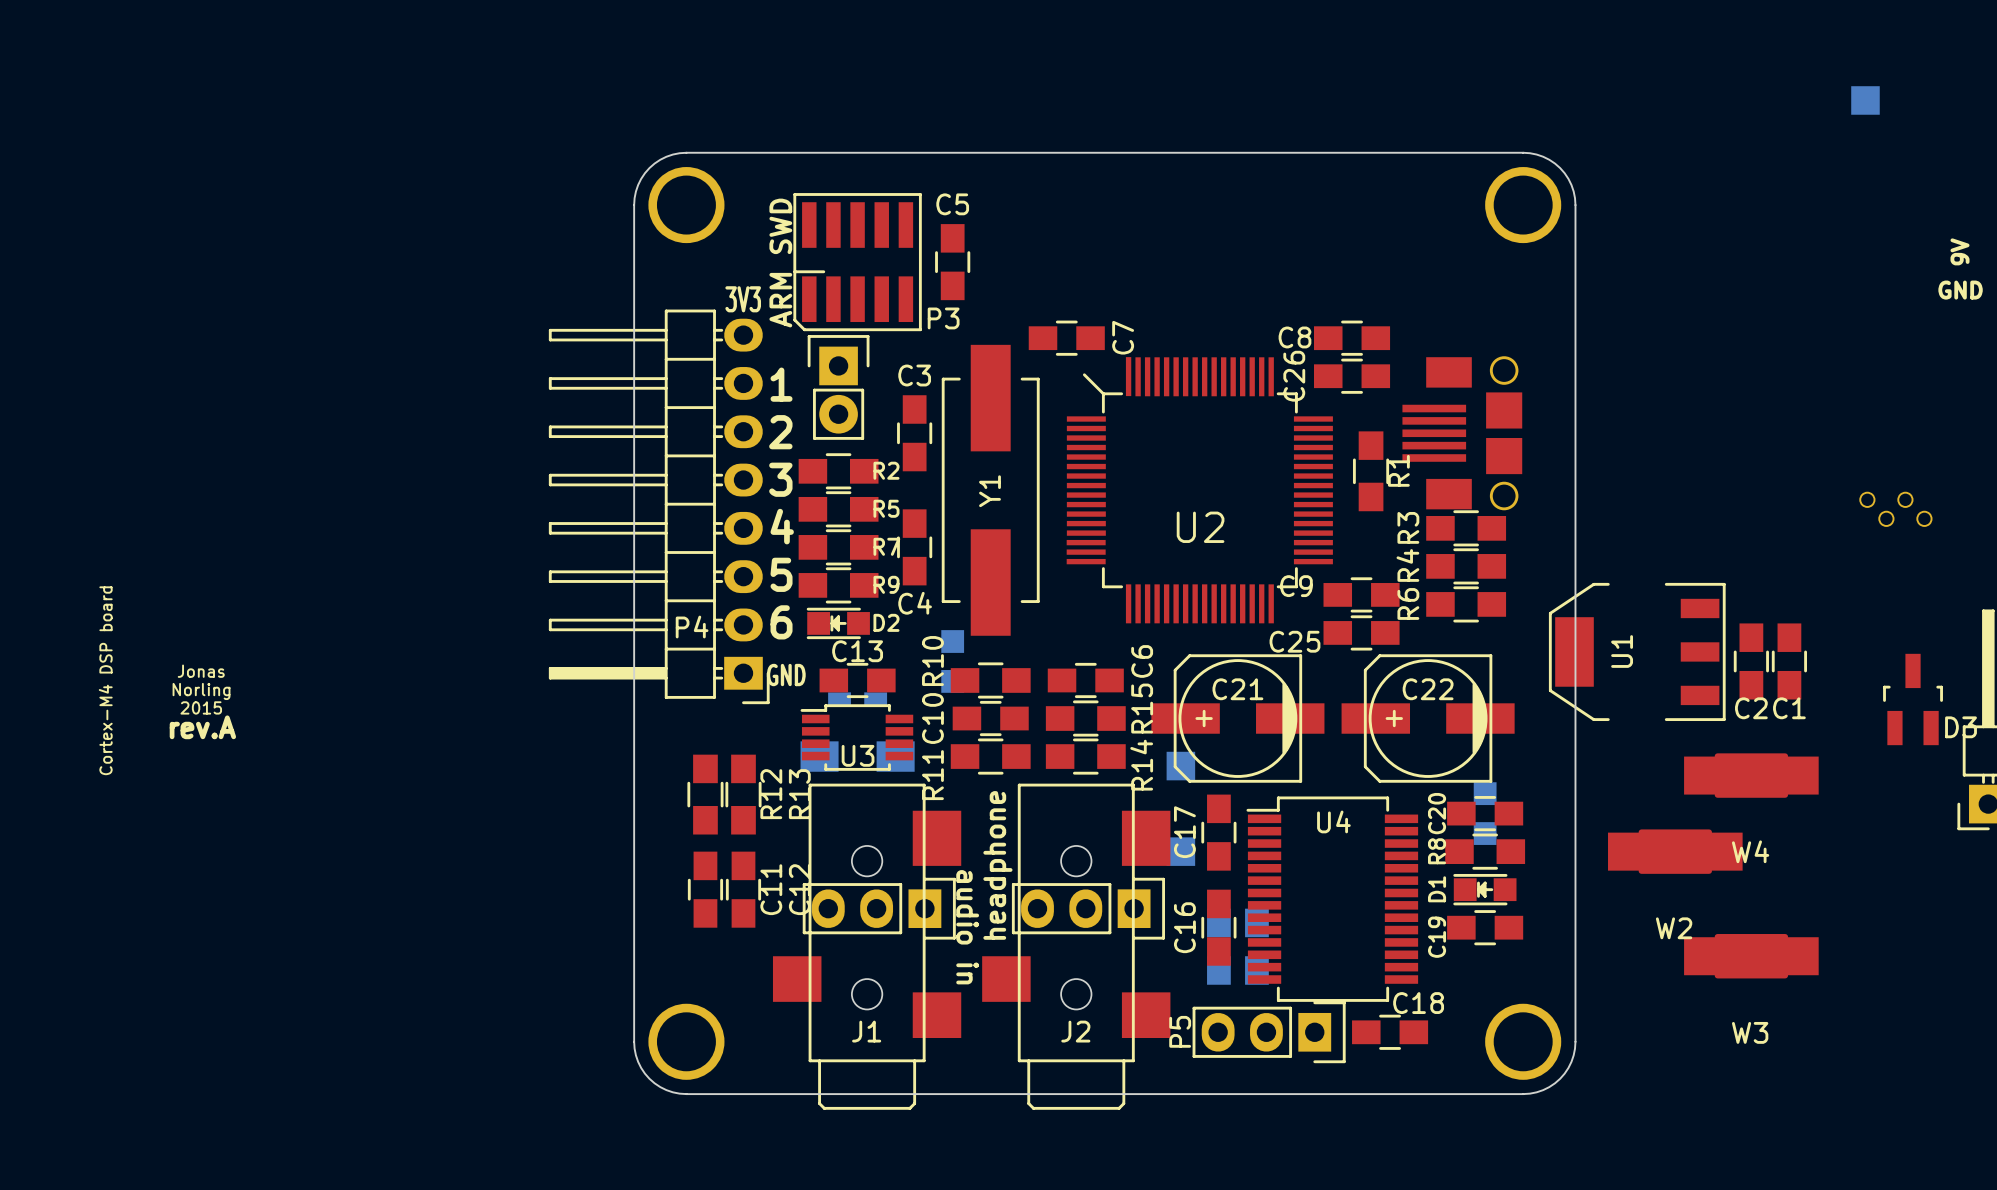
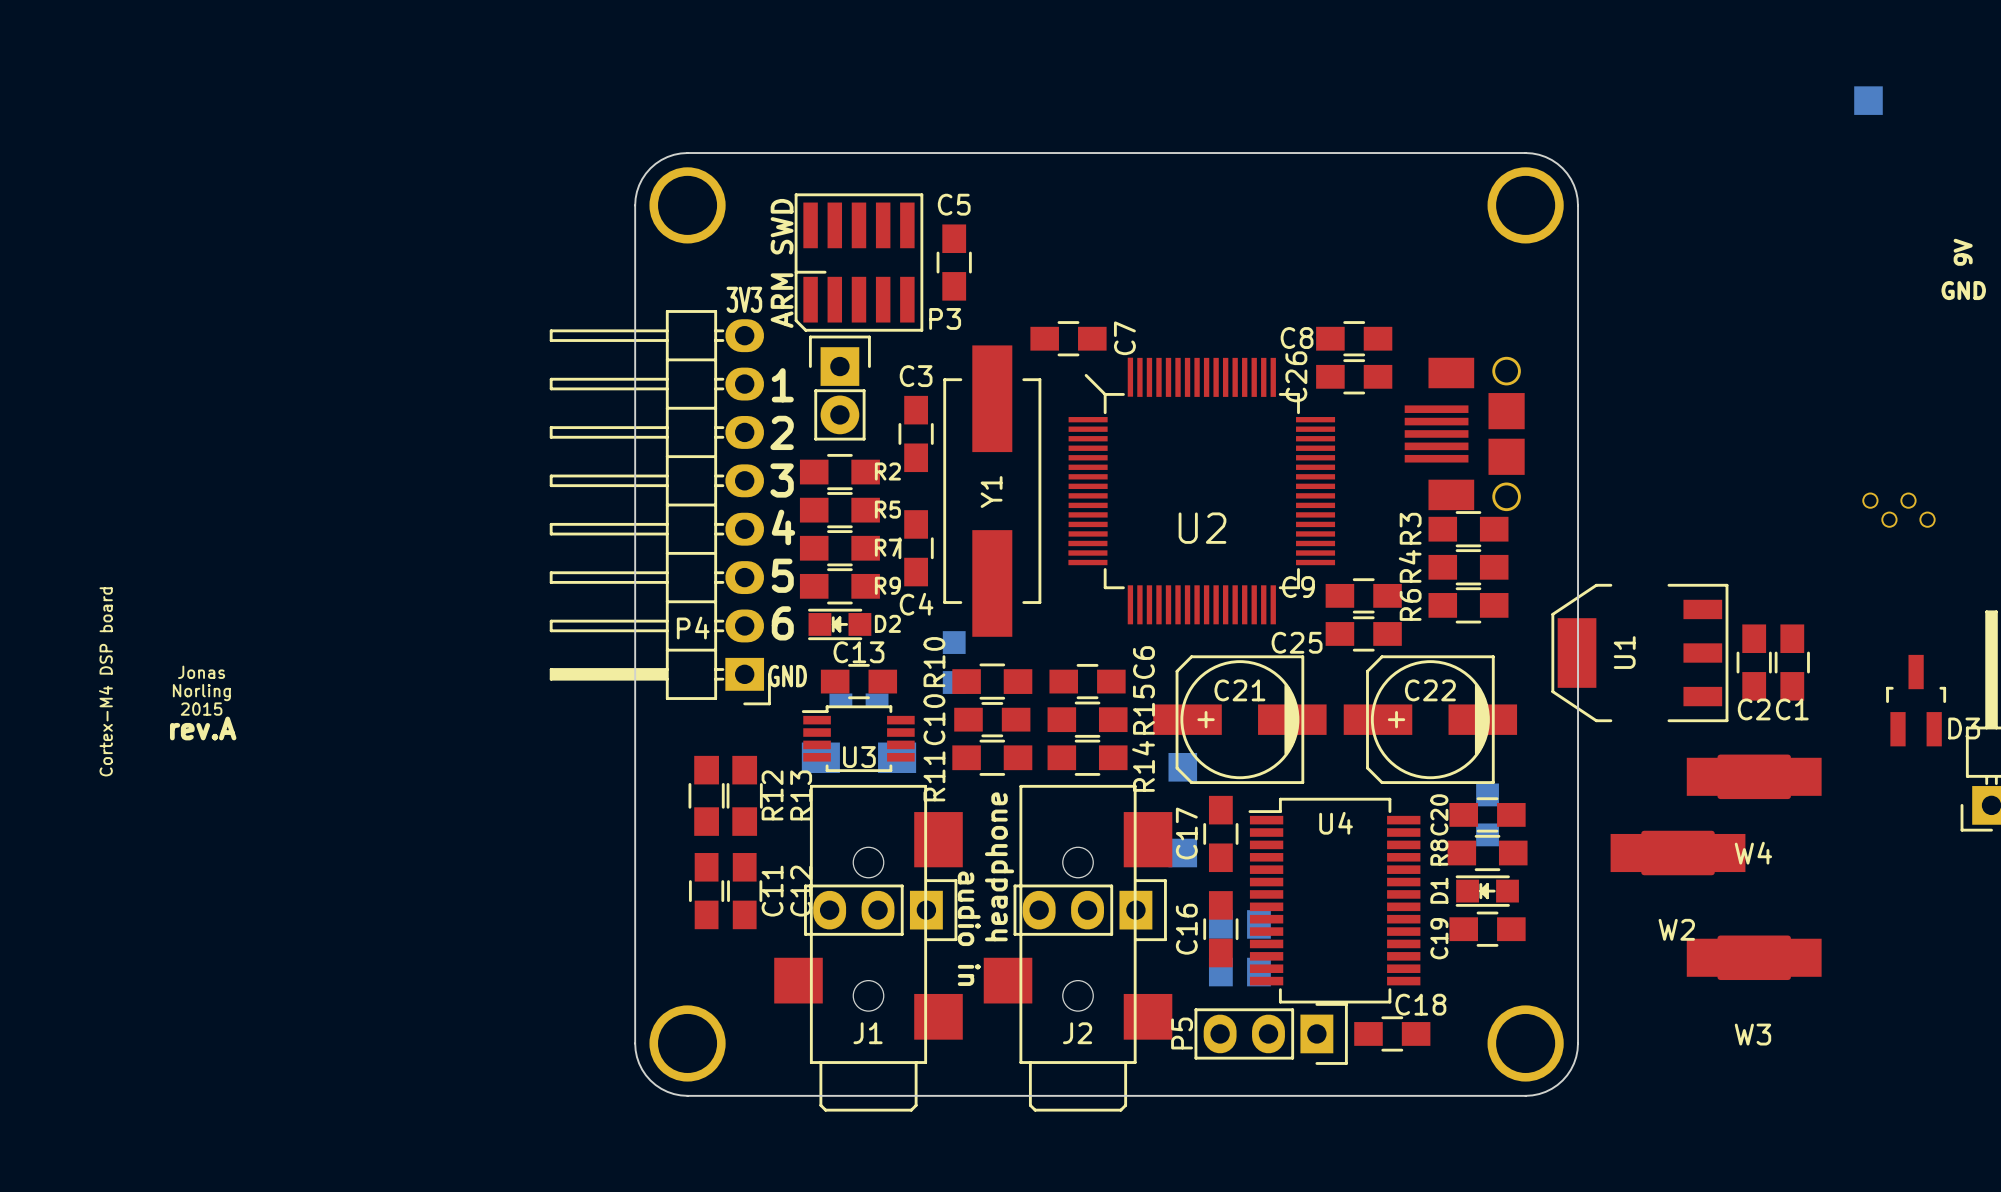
R1: (1371, 471) -> none

